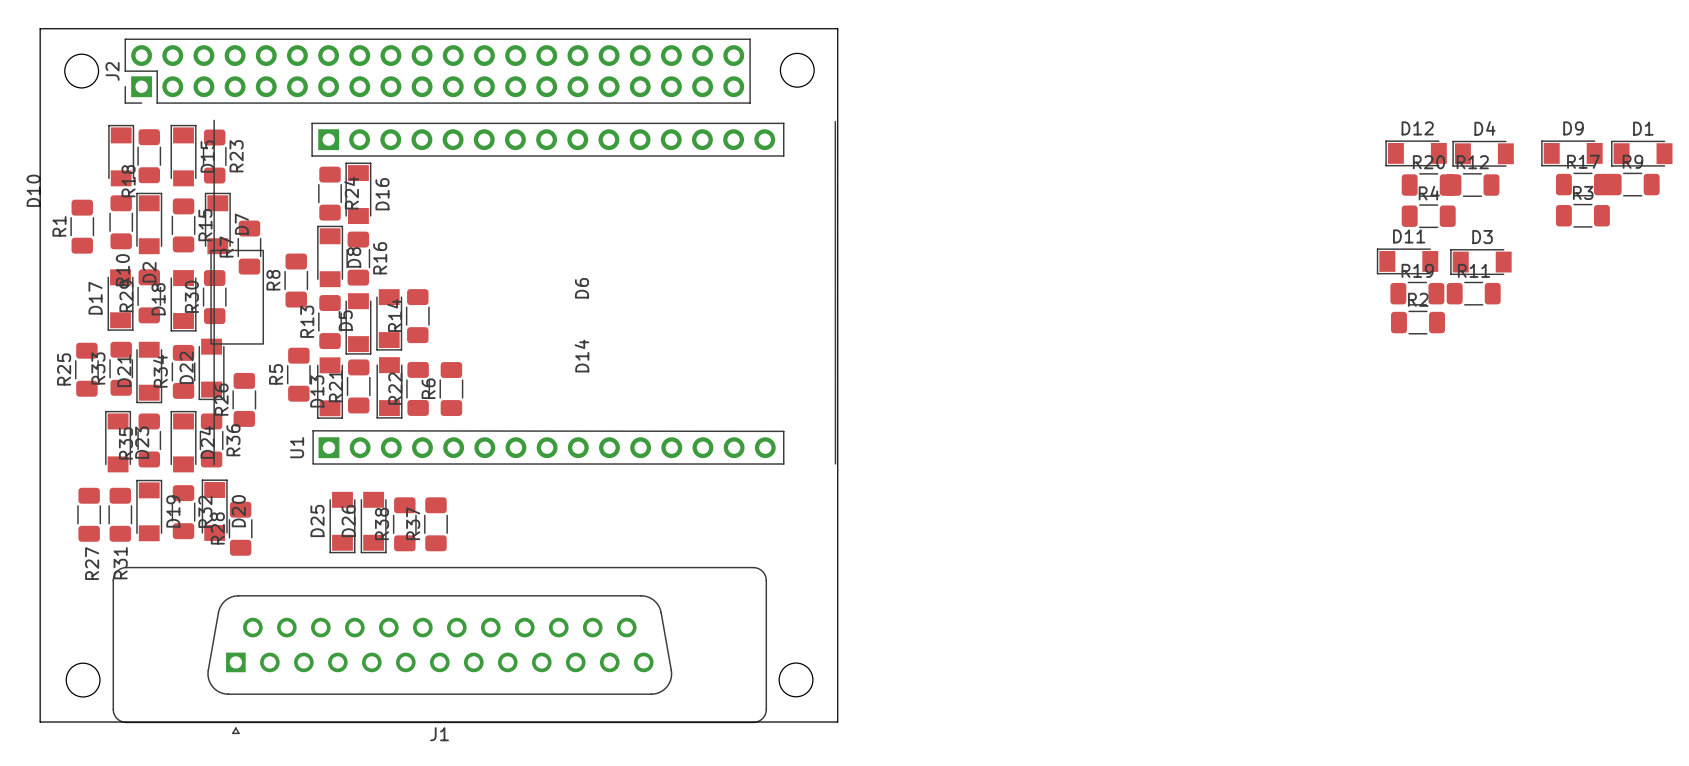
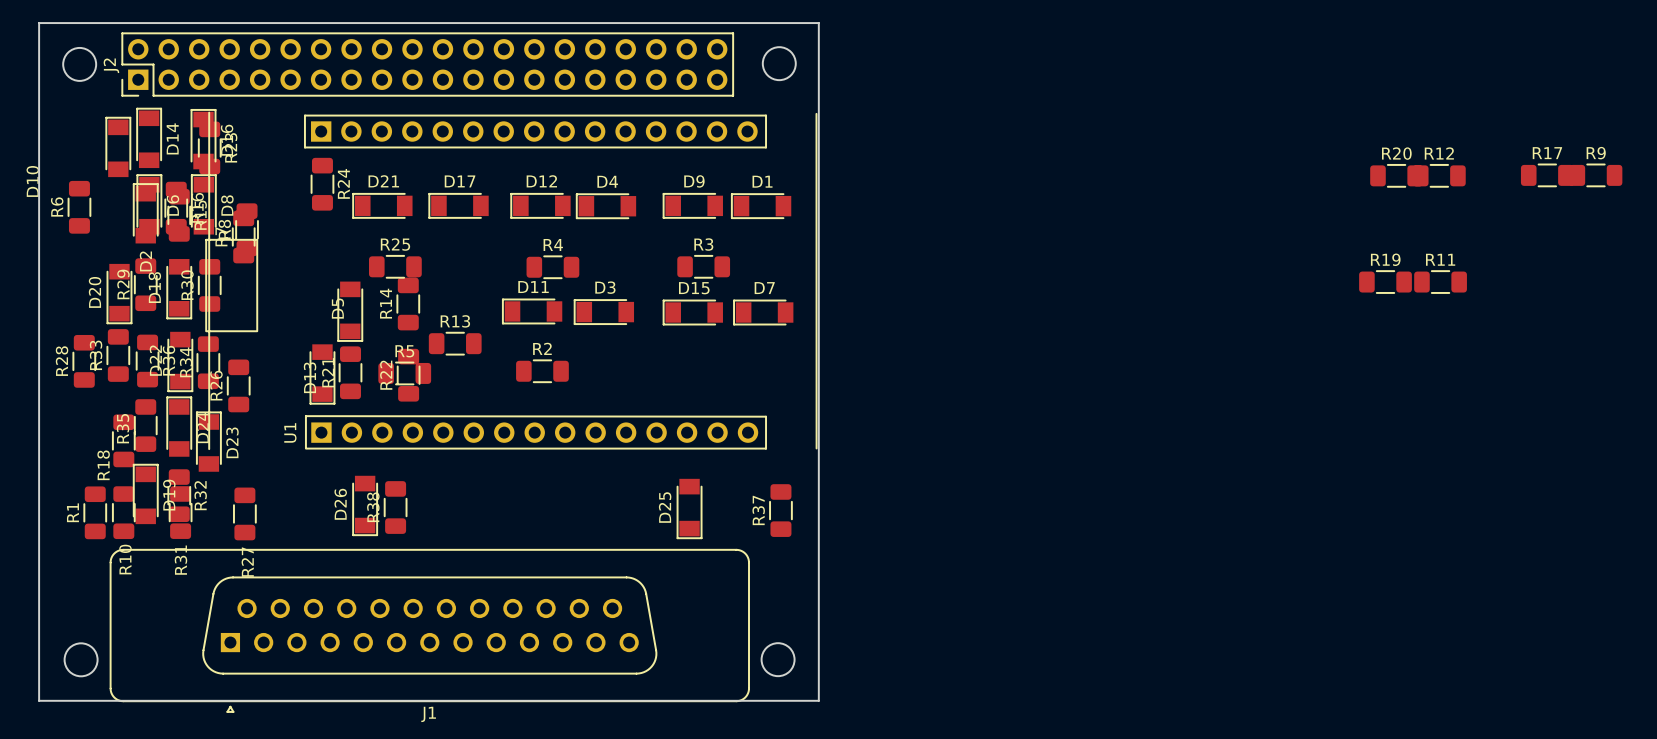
D12 position: (1416, 153) -> (540, 205)
D4 position: (1483, 153) -> (606, 206)
D9 position: (1571, 153) -> (692, 205)
D1 position: (1641, 153) -> (761, 206)
D15 rotation: 0° (183, 155) -> 90° counterclockwise (692, 312)
D15 position: (183, 155) -> (692, 312)
R18 position: (149, 156) -> (123, 440)
D16 position: (358, 193) -> (203, 139)
R3 position: (1582, 215) -> (703, 266)
R4 position: (1428, 216) -> (552, 267)
R10 position: (121, 222) -> (123, 512)
D7 rotation: 0° (217, 223) -> 90° counterclockwise (763, 312)
D7 position: (217, 223) -> (763, 312)
R1 position: (82, 226) -> (95, 512)
D8 position: (330, 256) -> (203, 204)
R16 position: (358, 258) -> (176, 208)
D11 position: (1407, 261) -> (532, 311)
D3 position: (1480, 262) -> (603, 312)
R8 position: (296, 280) -> (247, 229)
D6 name position: D6 (582, 288) -> D6 (172, 205)
D17 rotation: 0° (120, 300) -> 90° clockwise (458, 205)
D17 position: (120, 300) -> (458, 205)
D6 rotation: 0° (389, 319) -> 180° (149, 204)
D6 position: (389, 319) -> (149, 204)
R13 rotation: 0° (330, 322) -> 90° clockwise (455, 343)
R13 position: (330, 322) -> (455, 343)
R2 position: (1417, 322) -> (542, 371)
D14 name position: D14 (581, 356) -> D14 (172, 138)
R25 rotation: 0° (86, 369) -> 90° clockwise (395, 266)
R25 position: (86, 369) -> (395, 266)
D22 position: (211, 369) -> (180, 361)
R34 position: (183, 371) -> (208, 362)
D21 rotation: 0° (149, 372) -> 90° clockwise (382, 205)
D21 position: (149, 372) -> (382, 205)
R5 rotation: 0° (298, 374) -> 90° clockwise (404, 373)
R5 position: (298, 374) -> (404, 373)
D14 rotation: 0° (389, 387) -> 180° (149, 138)
D14 position: (389, 387) -> (149, 138)
R6 position: (451, 389) -> (79, 207)
R36 position: (211, 440) -> (147, 361)
D23 position: (118, 441) -> (208, 441)
D20 rotation: 0° (214, 510) -> 180° (119, 293)
D20 position: (214, 510) -> (119, 293)
R27 position: (89, 514) -> (244, 513)
R31 position: (120, 514) -> (180, 512)
D25 position: (342, 522) -> (689, 508)
R37 position: (435, 524) -> (780, 510)
R28 position: (240, 528) -> (84, 361)

